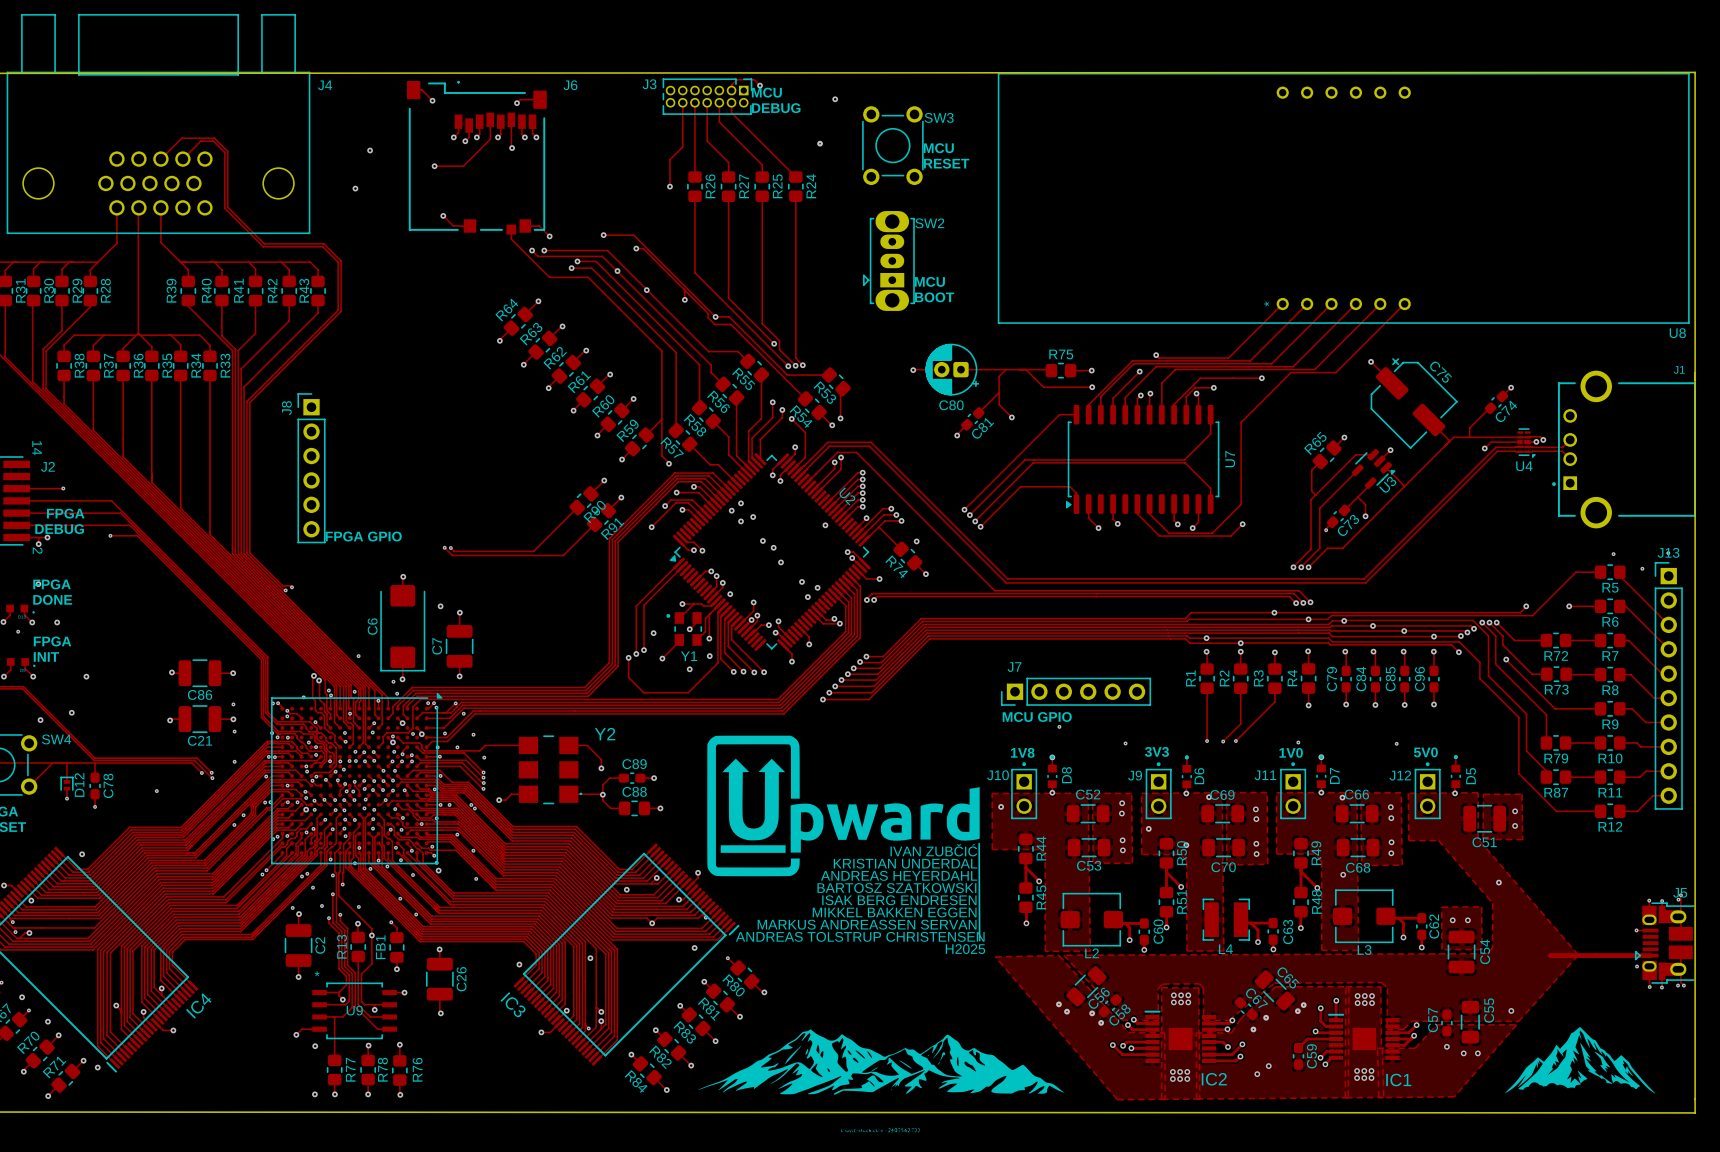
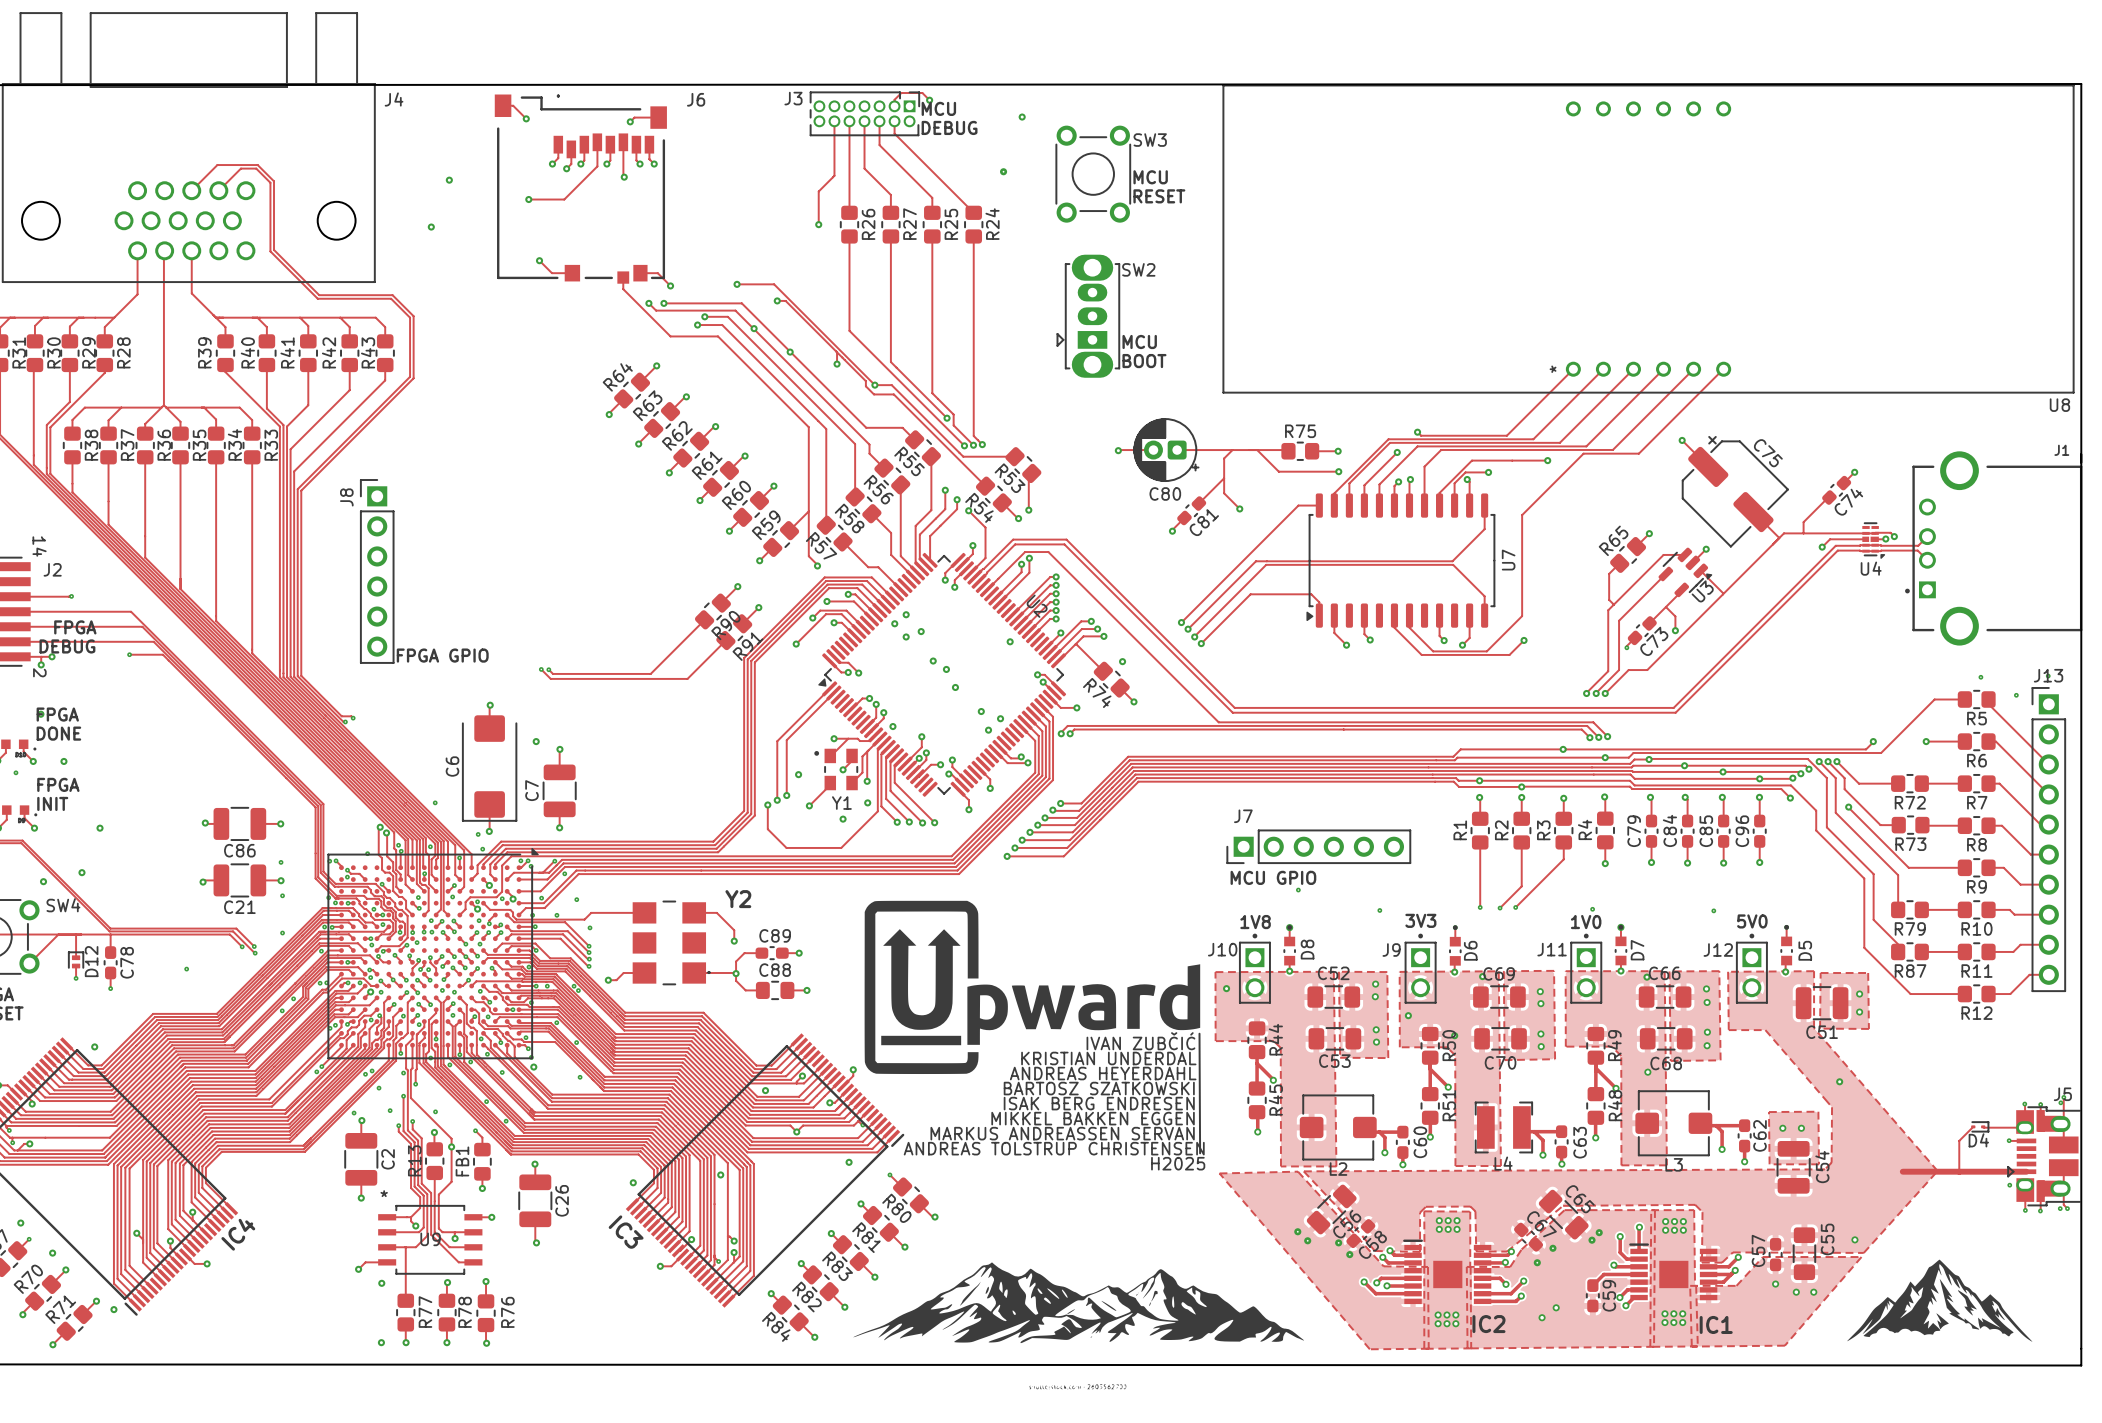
track: none -> (1973, 1126) (1959, 1140) (1959, 1171)
D4: none -> (1980, 1126)
track: none -> (1983, 1126) (2025, 1127)

